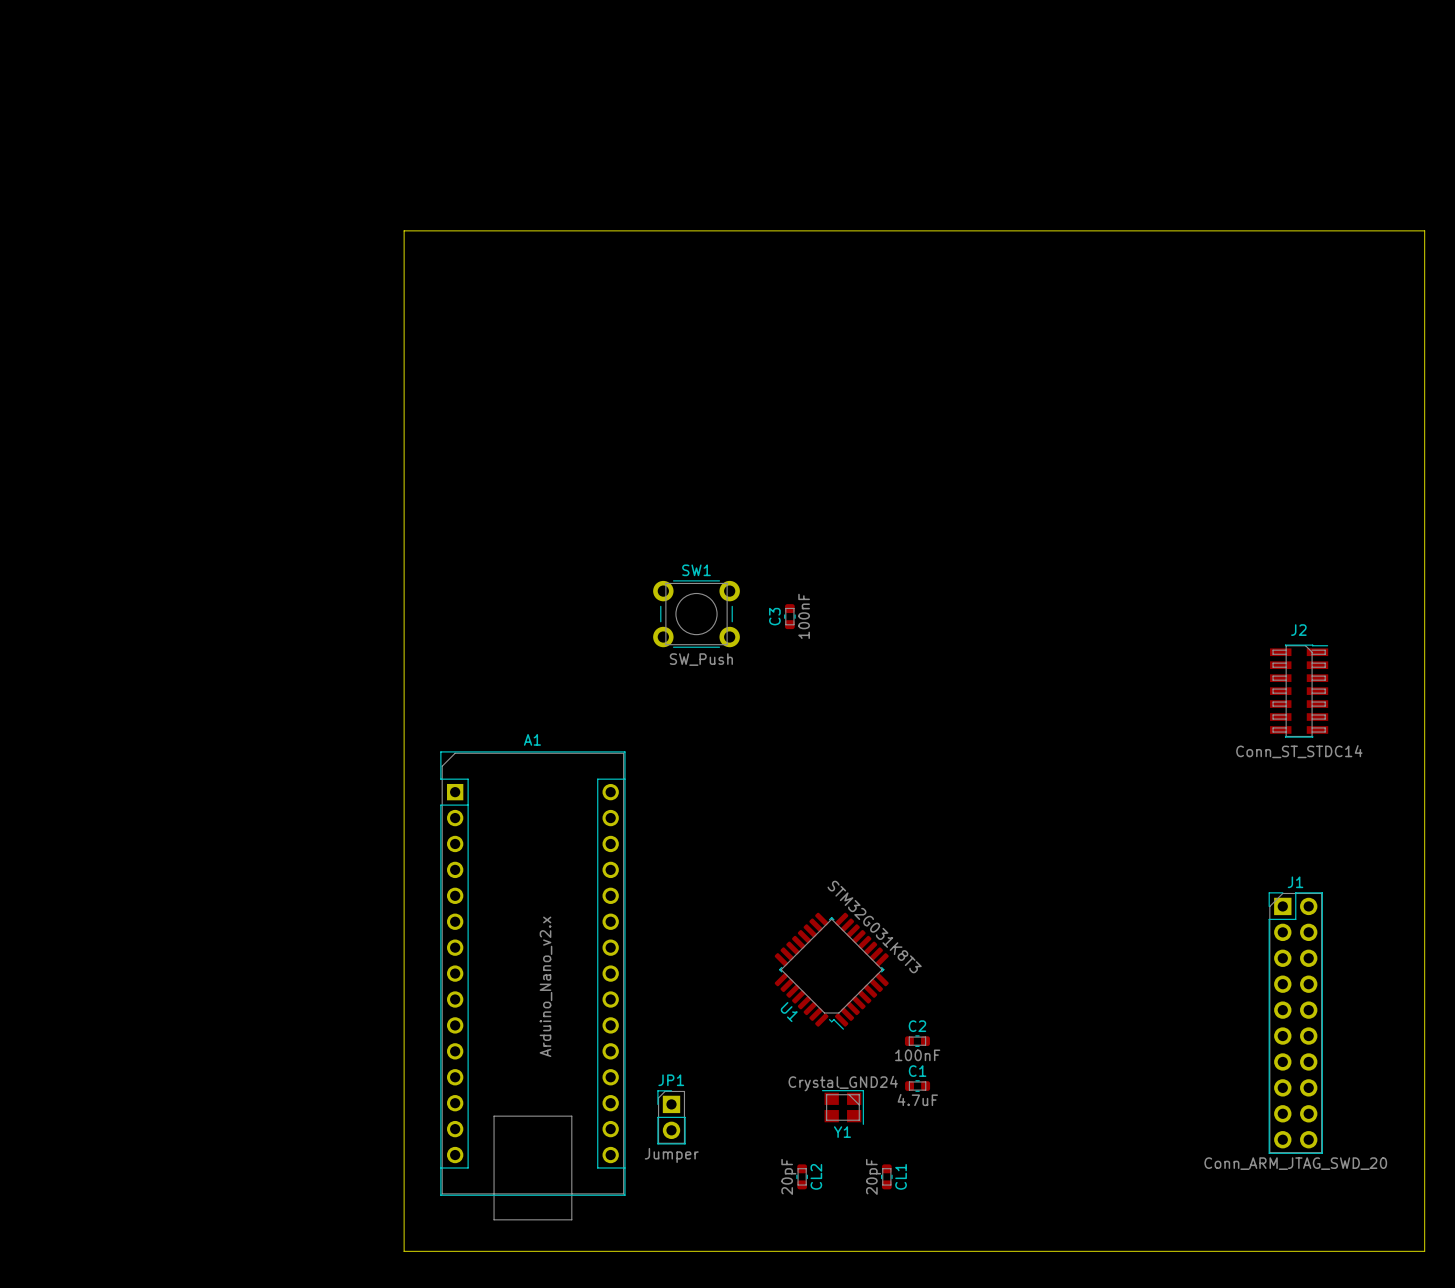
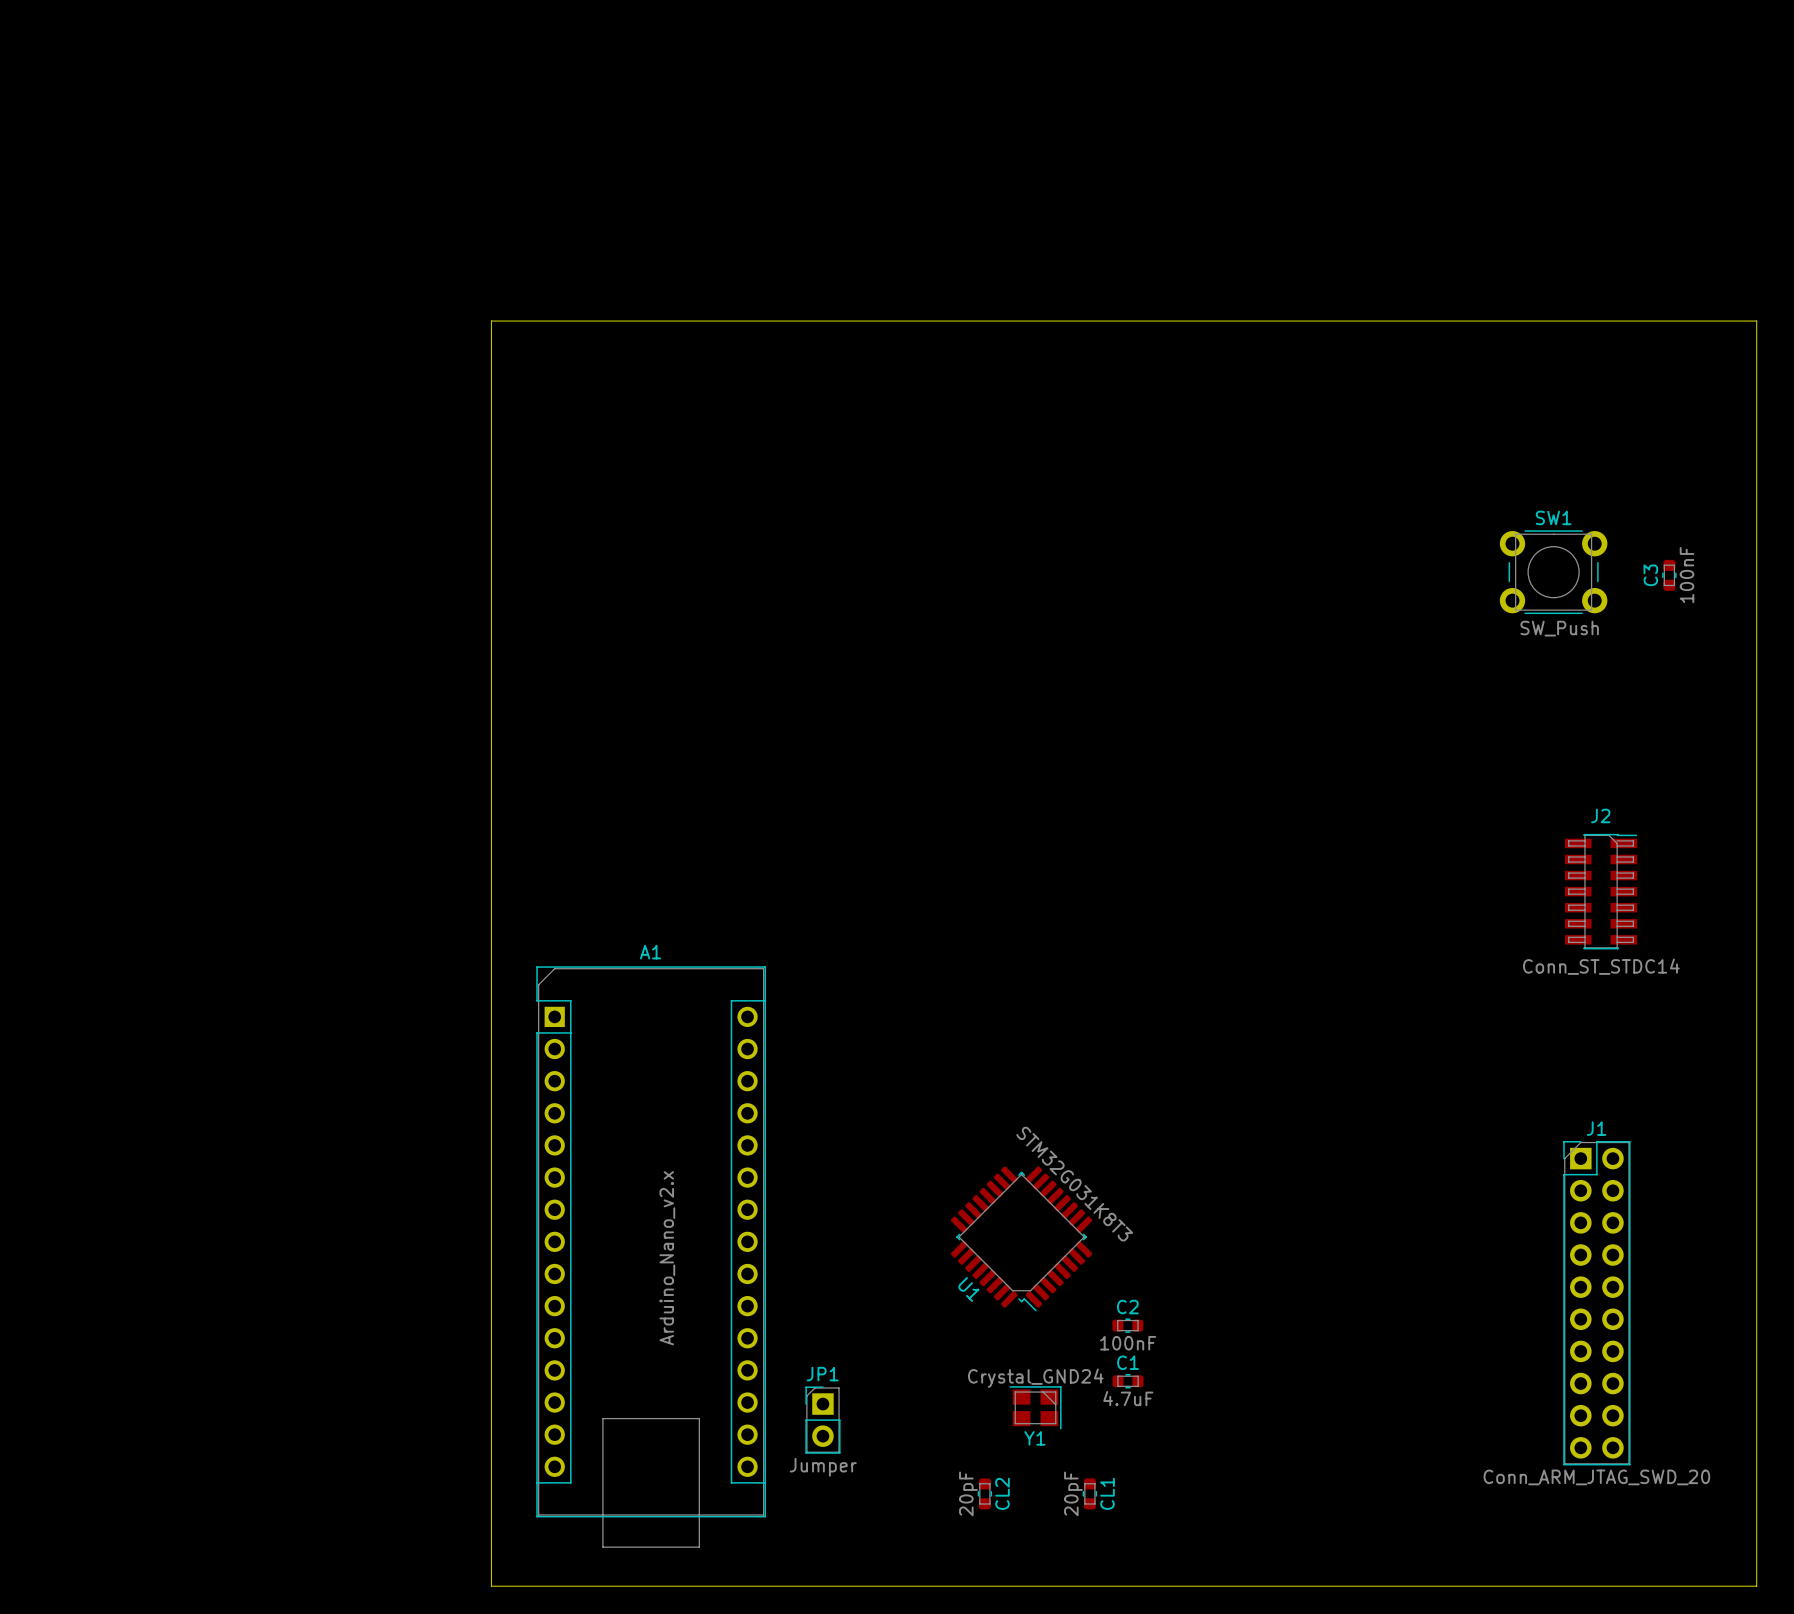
SW1 position: (696, 614) -> (1553, 572)
C3 position: (789, 616) -> (1669, 575)

